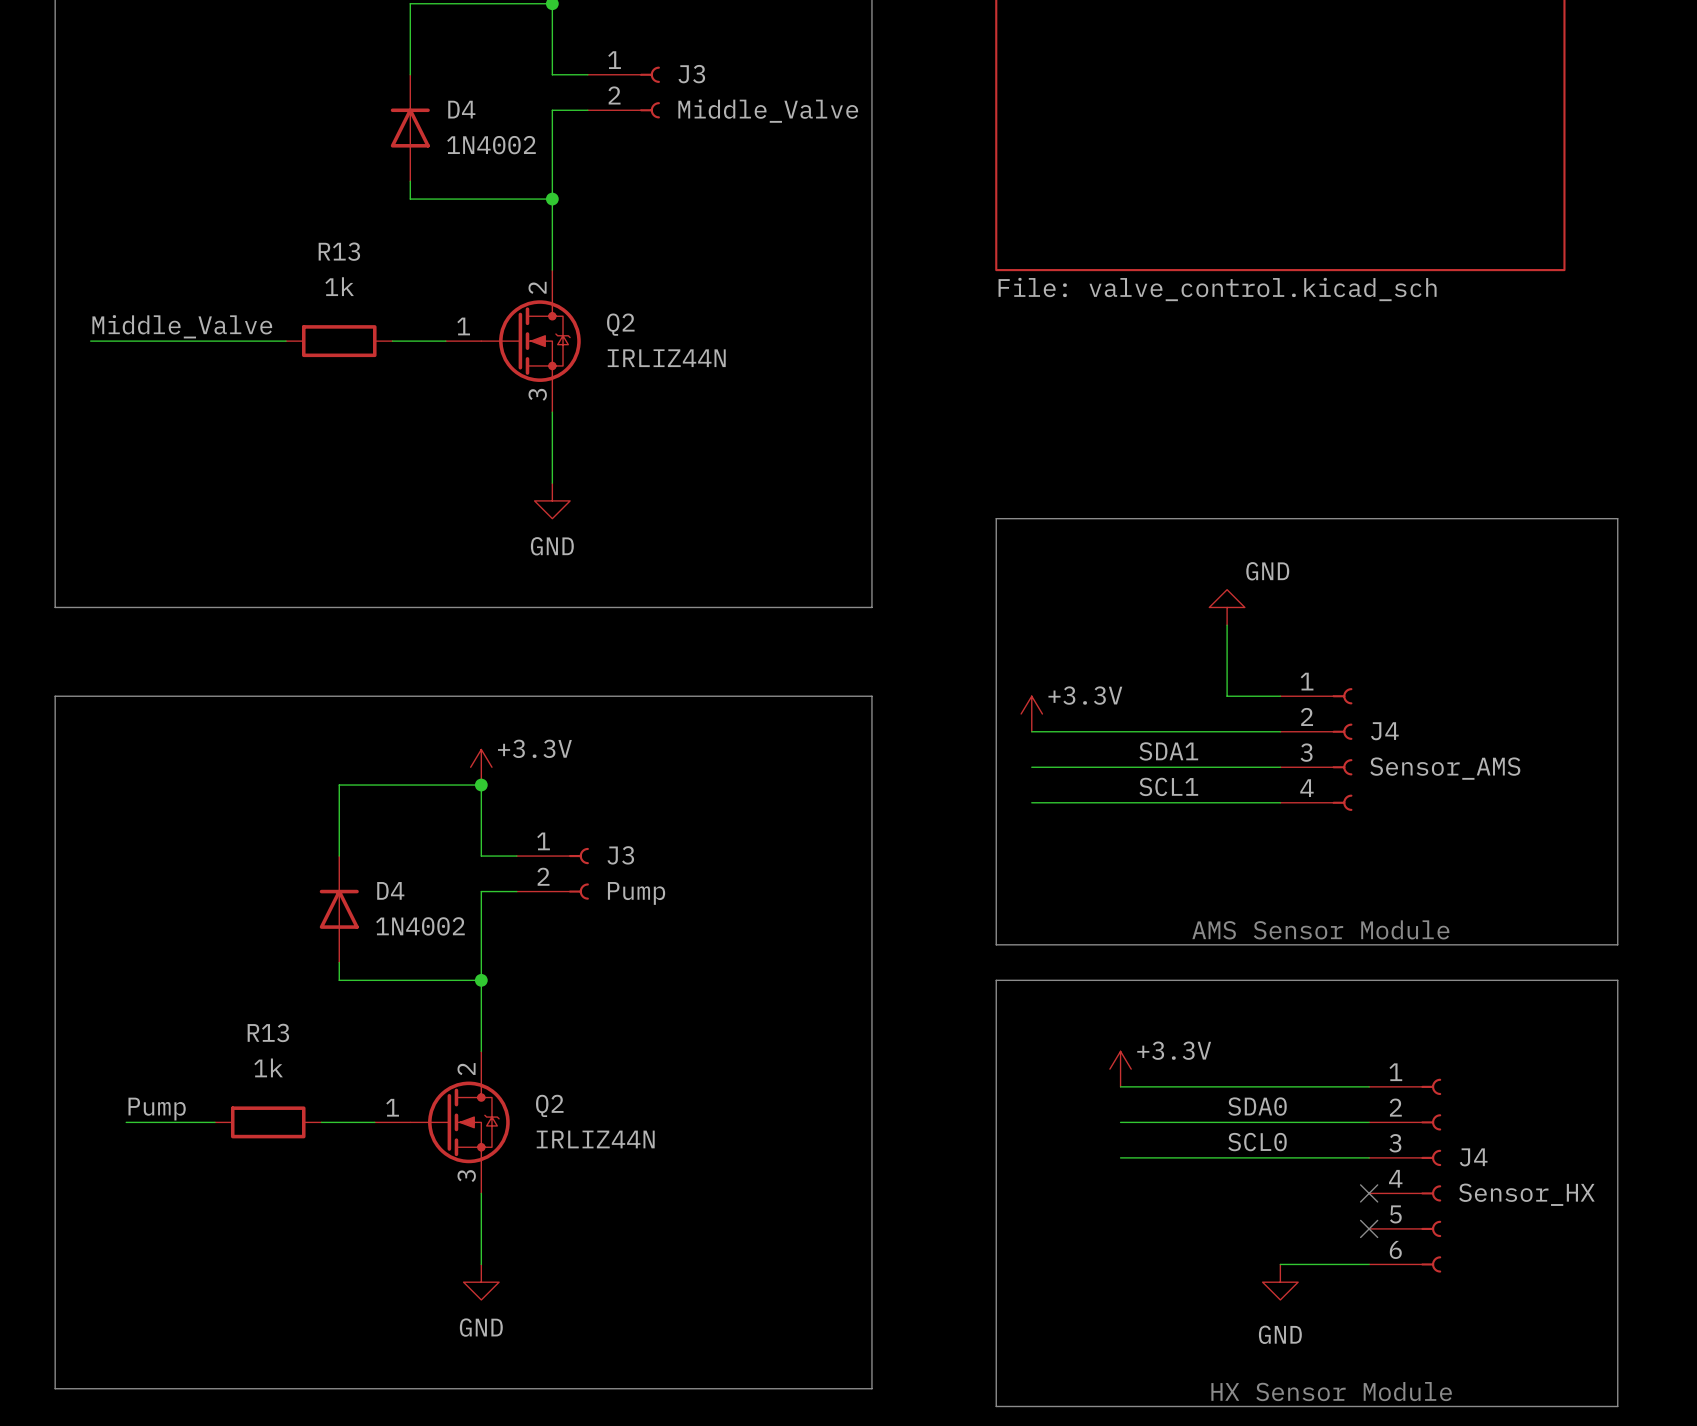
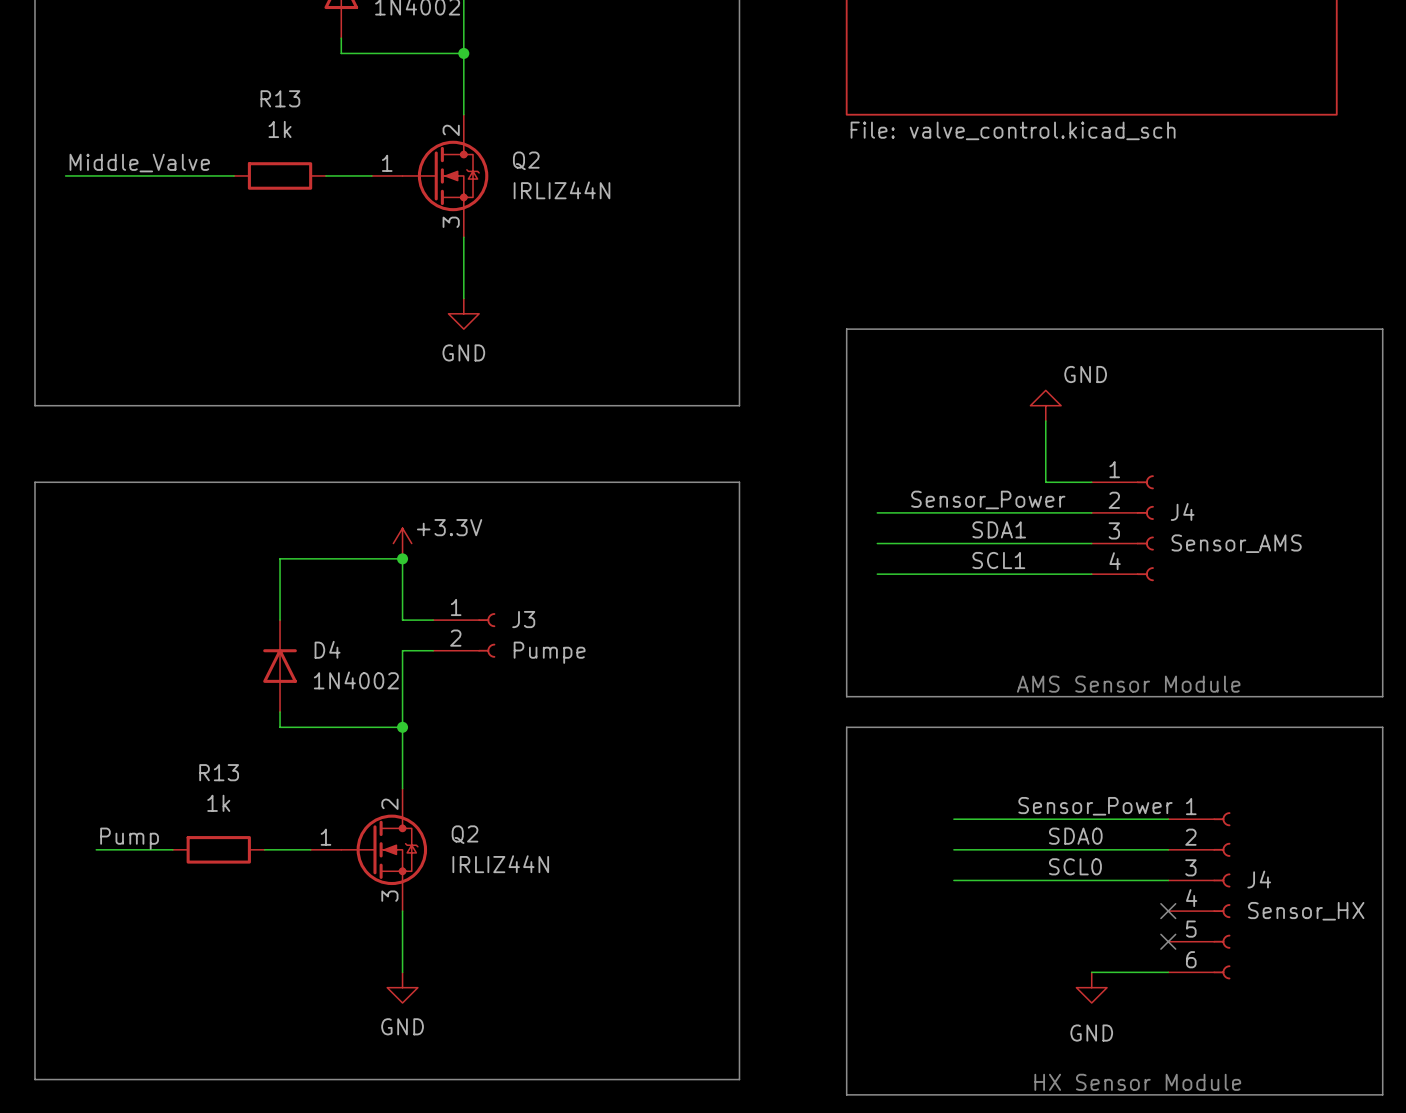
power symbol: +3.3V (1031, 713) -> none
label: none -> Sensor_Power (988, 499)
J3 value: Pump (636, 893) -> Pumpe (549, 652)
power symbol: +3.3V (1120, 1069) -> none
label: none -> Sensor_Power (1095, 806)

